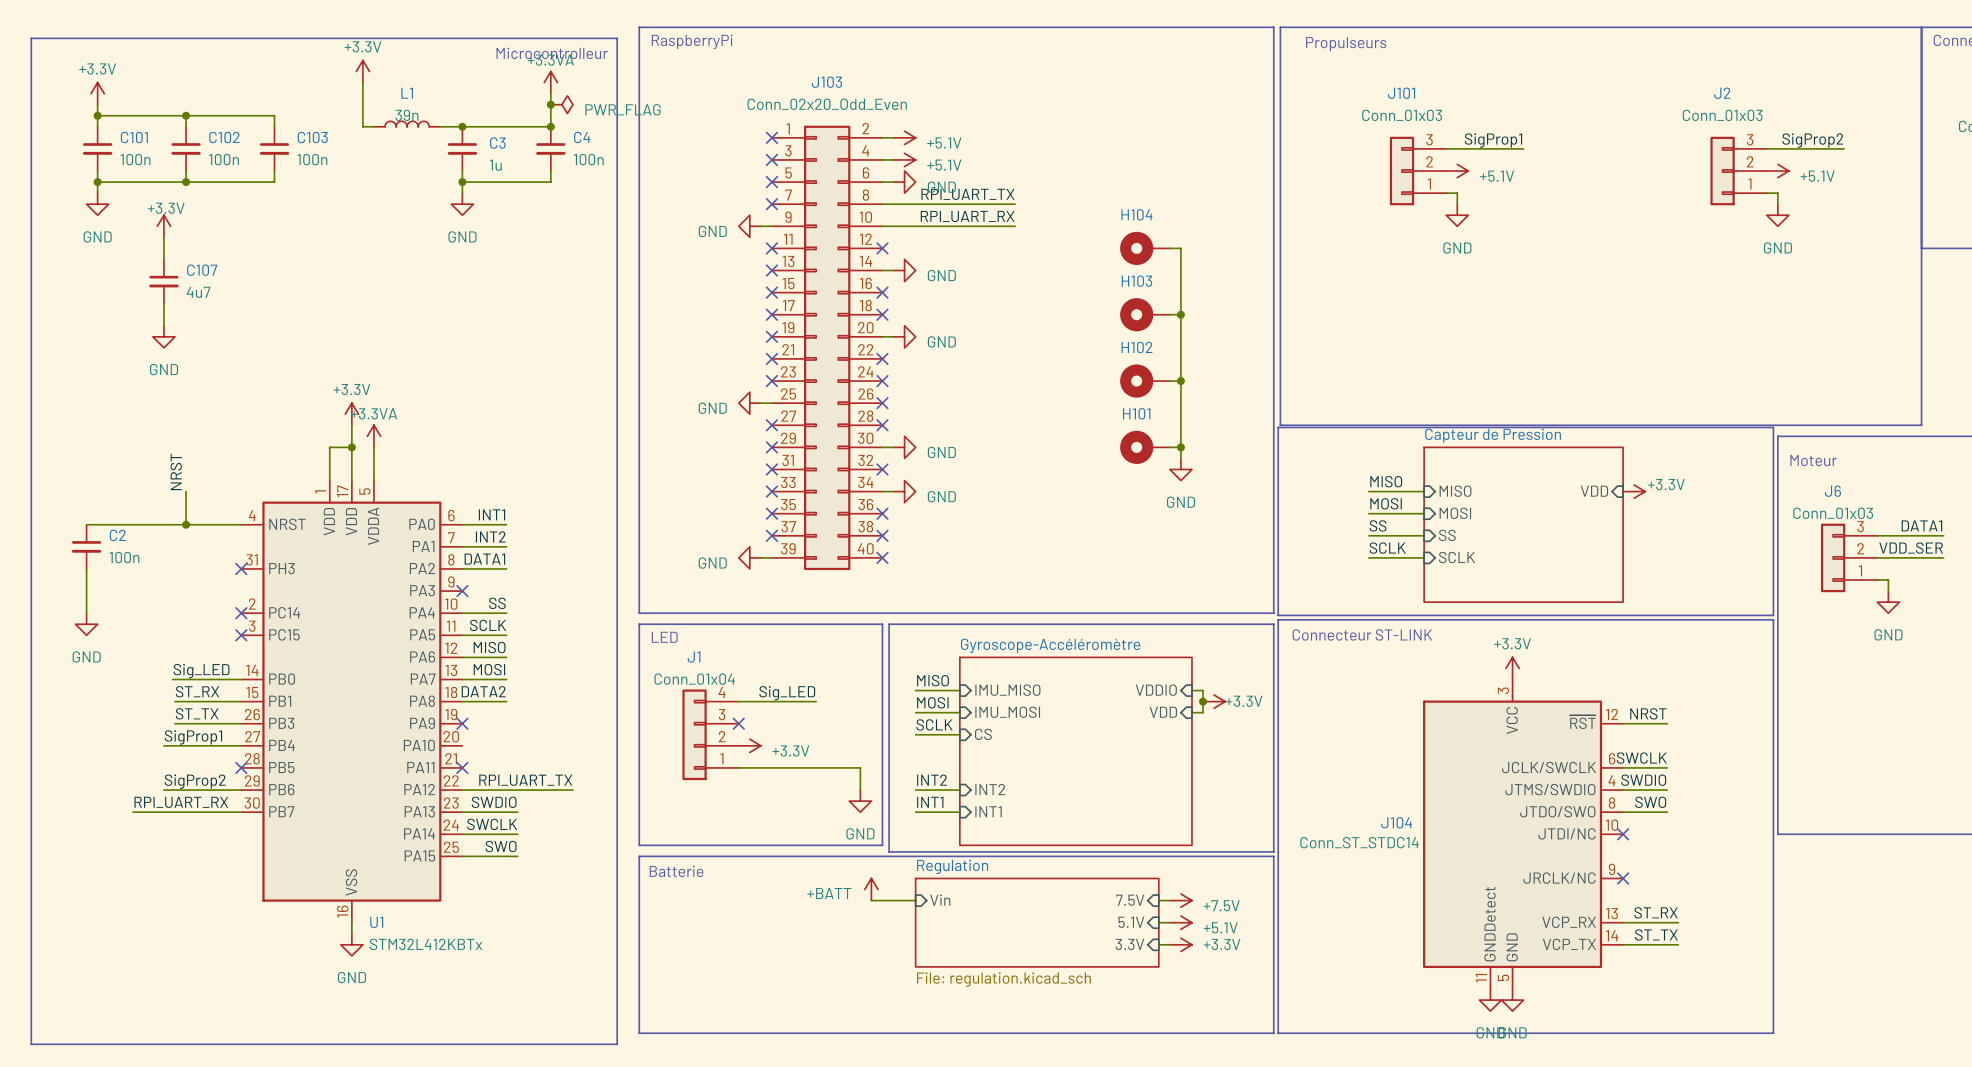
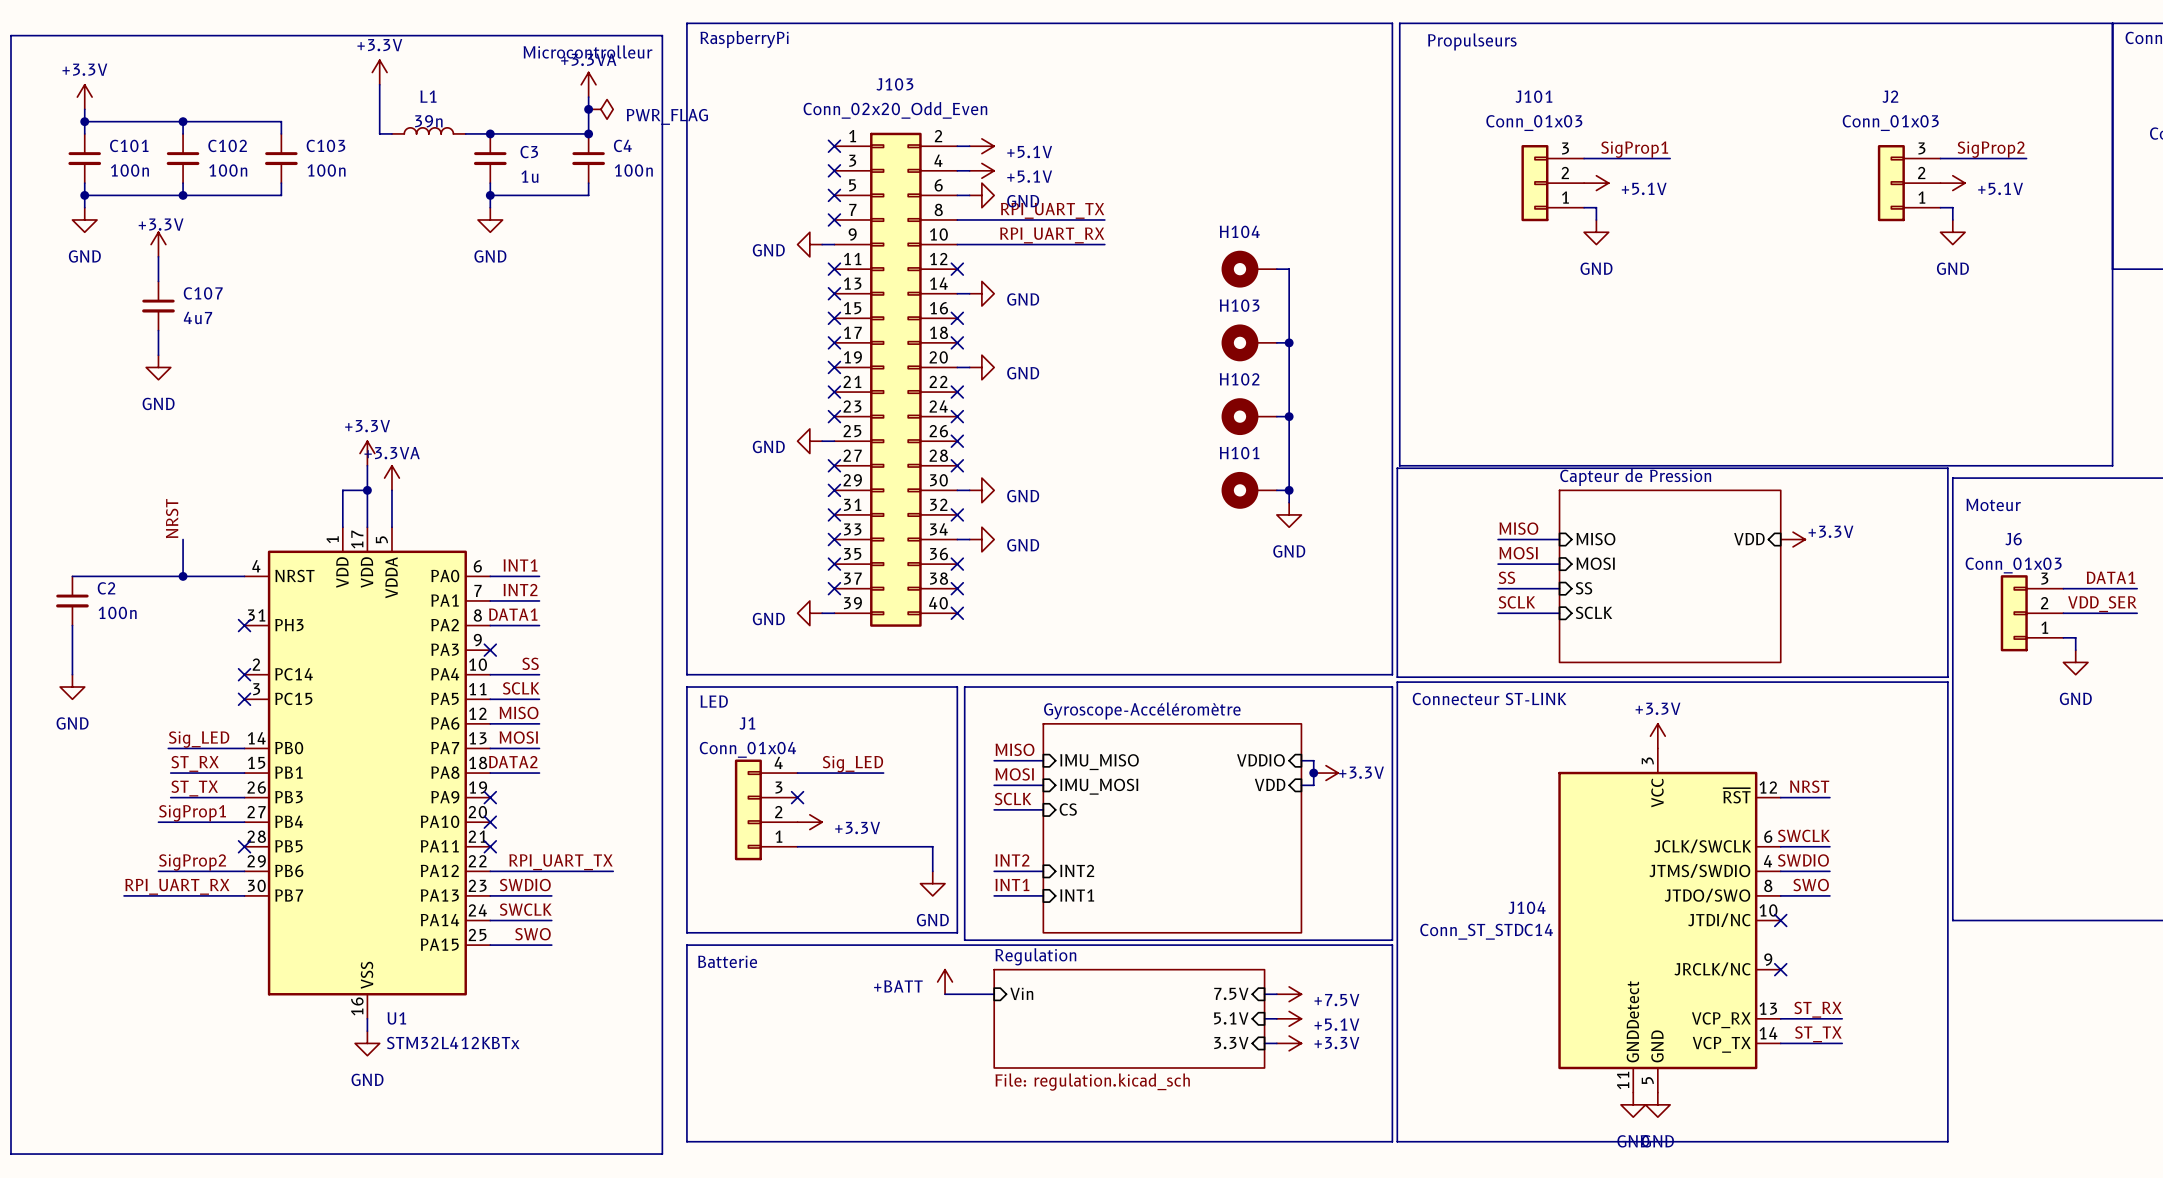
no-connect mark: none -> (490, 822)

